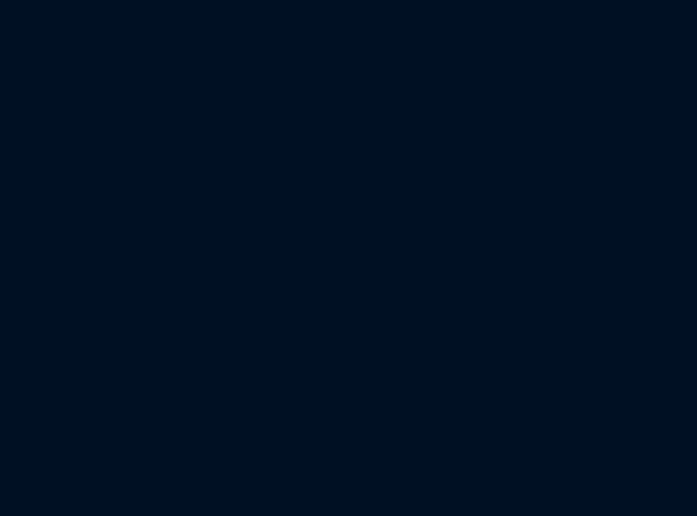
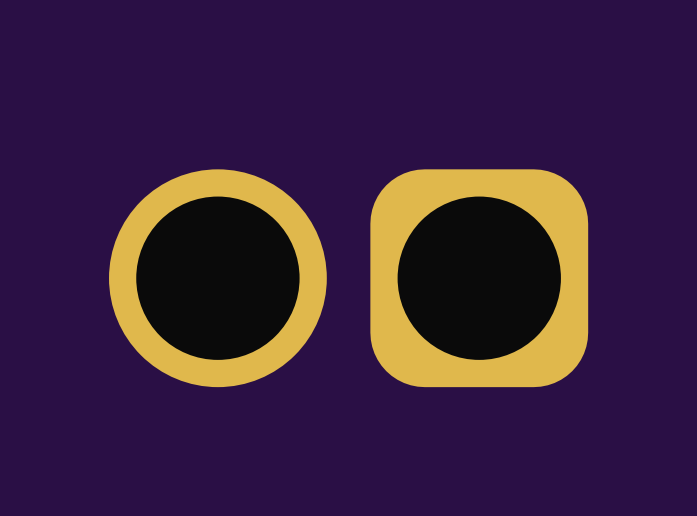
part: none -> (348, 278)

